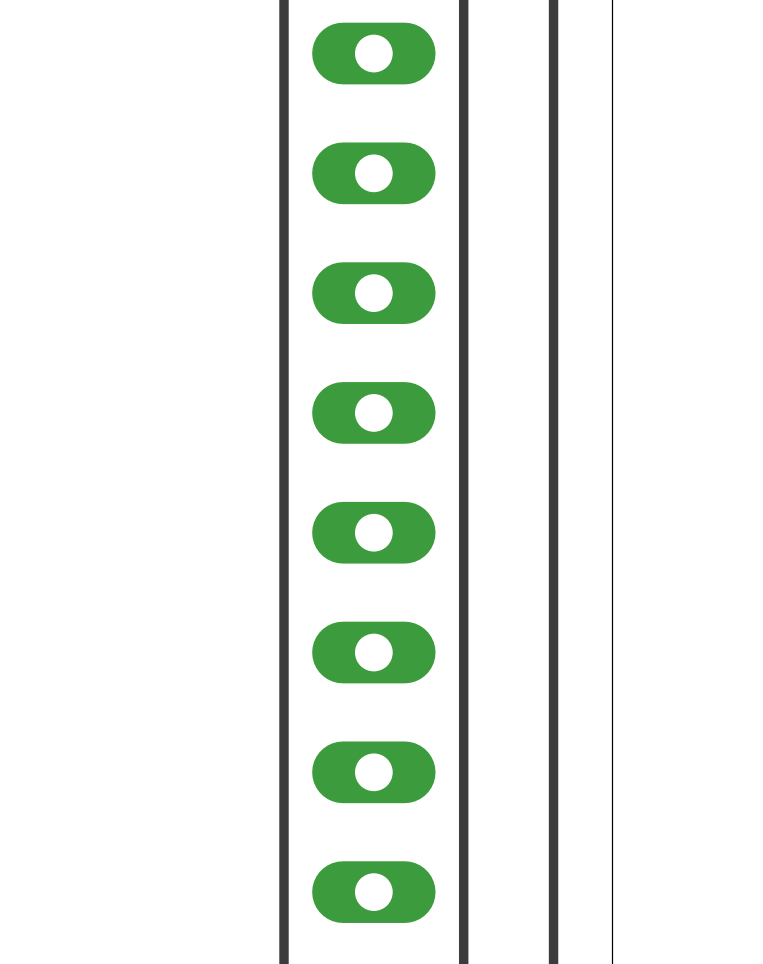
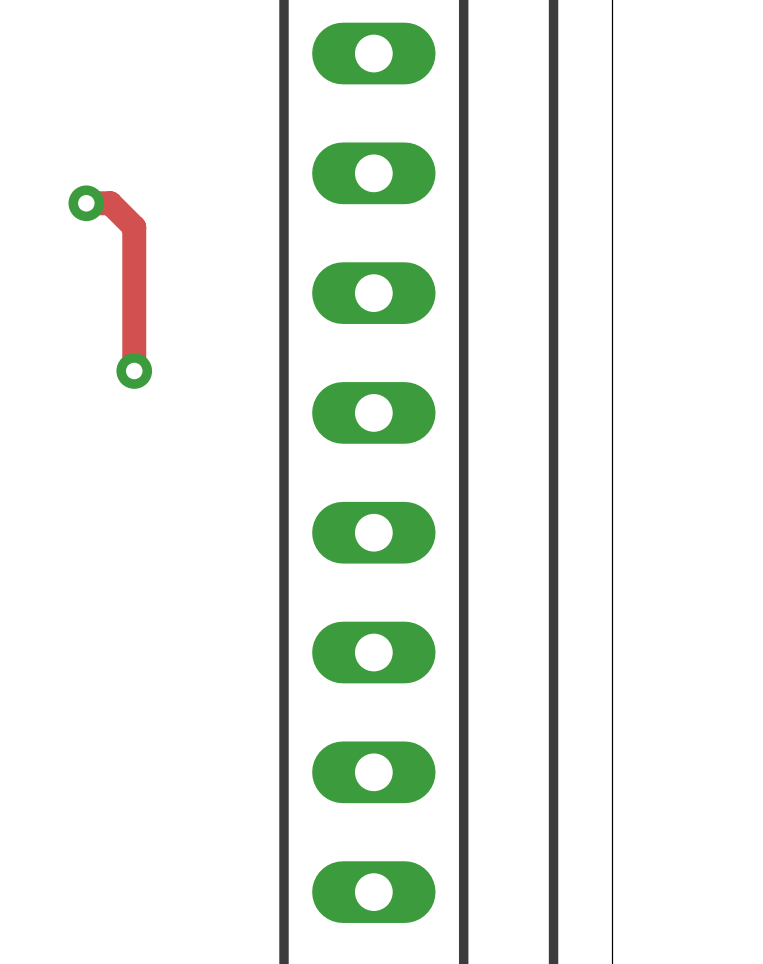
track: none -> (86, 203) (110, 203) (134, 227) (134, 370)
via: none -> (86, 203)
via: none -> (134, 370)

